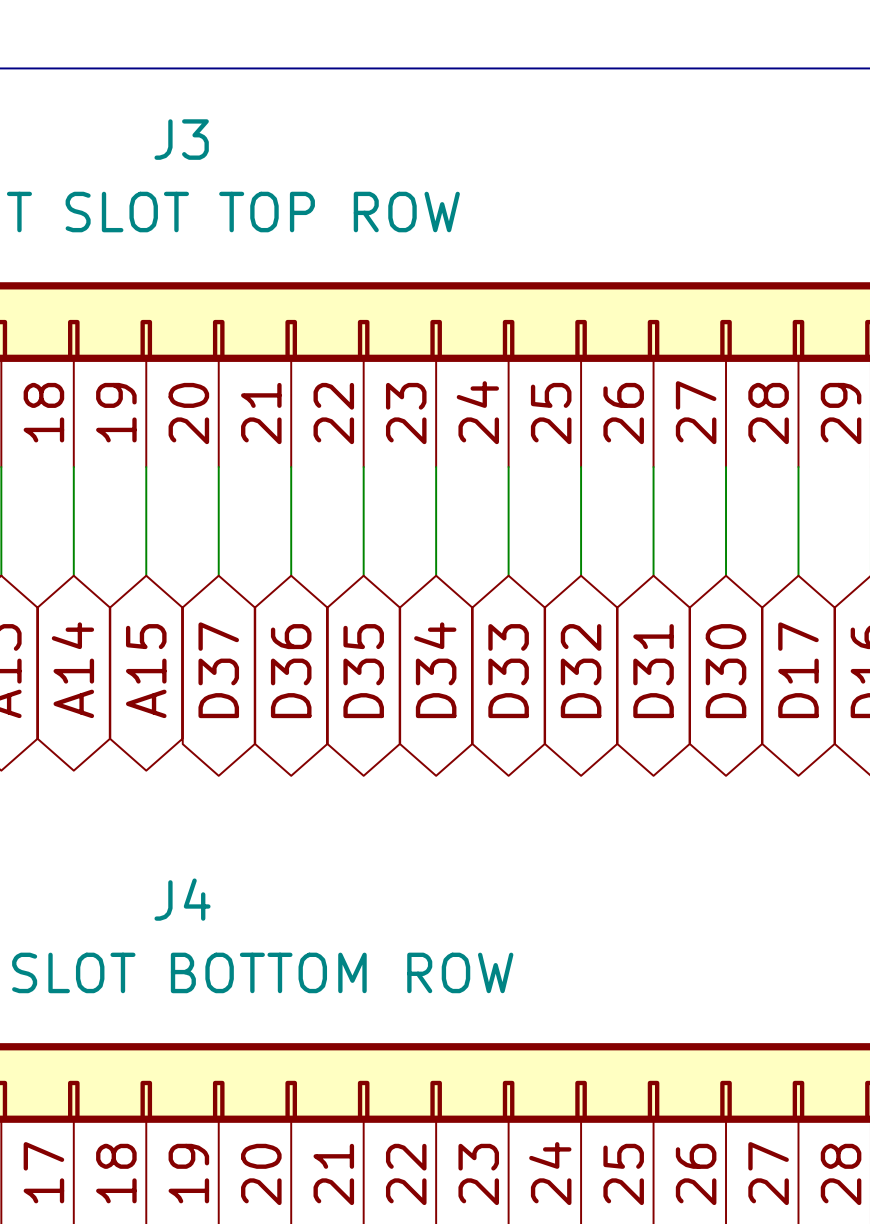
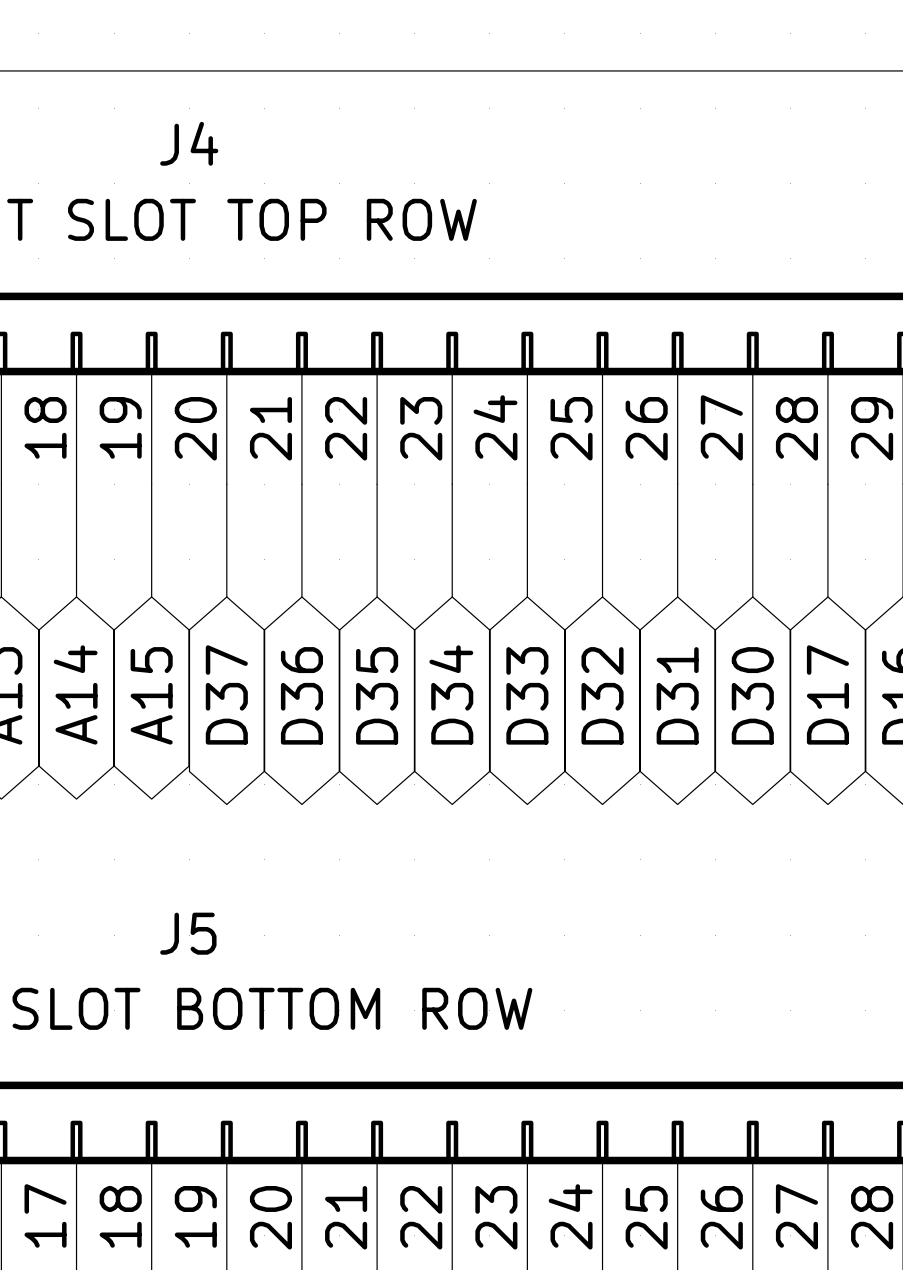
J3 name: J3 (181, 139) -> J4 (189, 143)
J4 name: J4 (182, 899) -> J5 (188, 933)

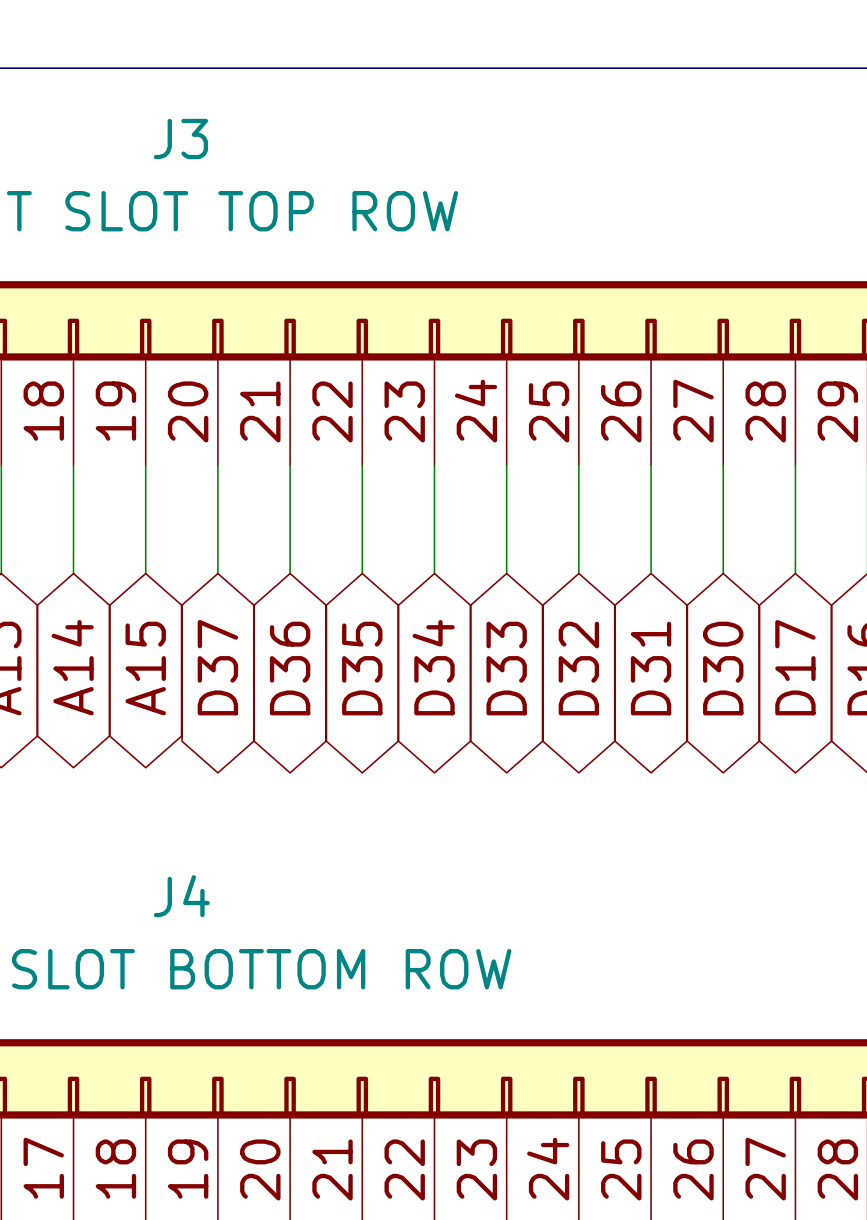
J4 name: J4 (189, 143) -> J3 (180, 139)
J5 name: J5 (188, 933) -> J4 (181, 896)

